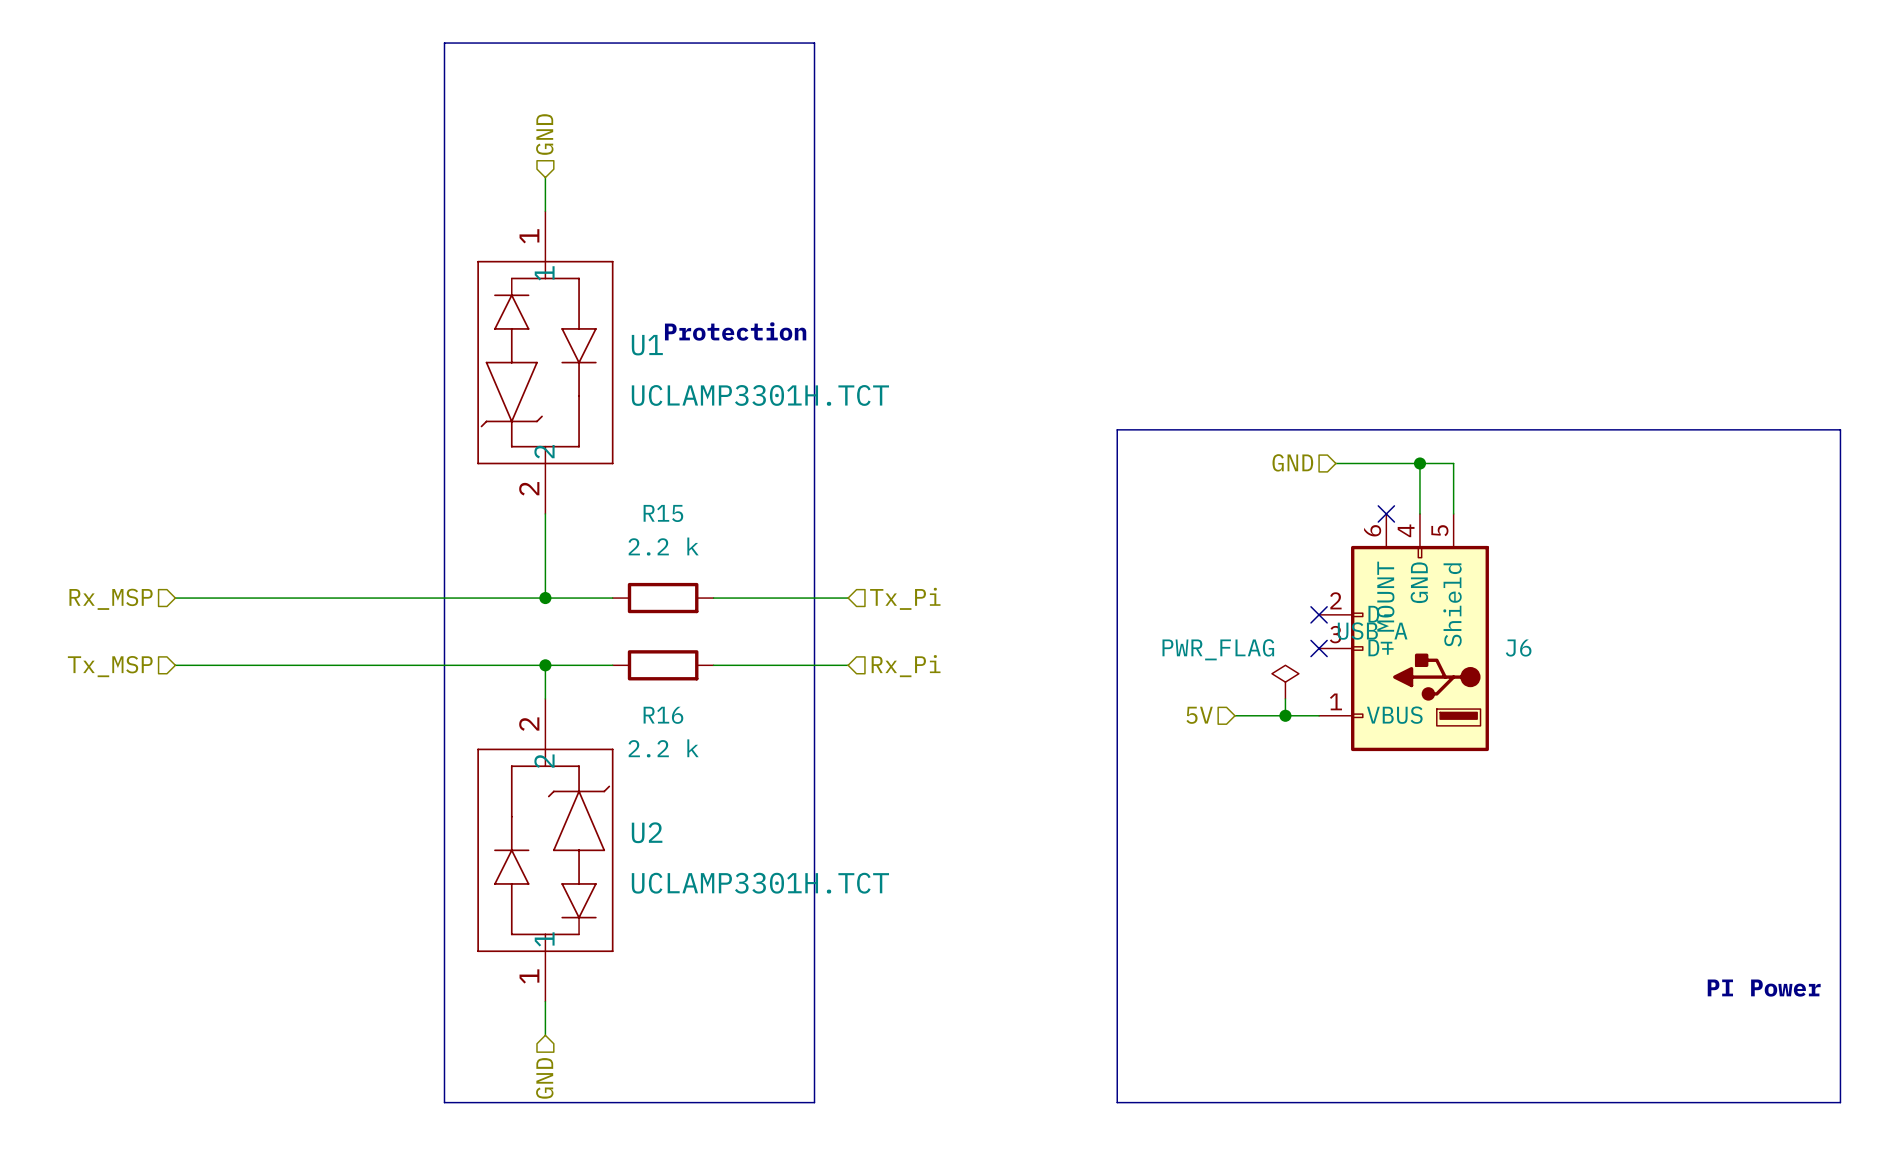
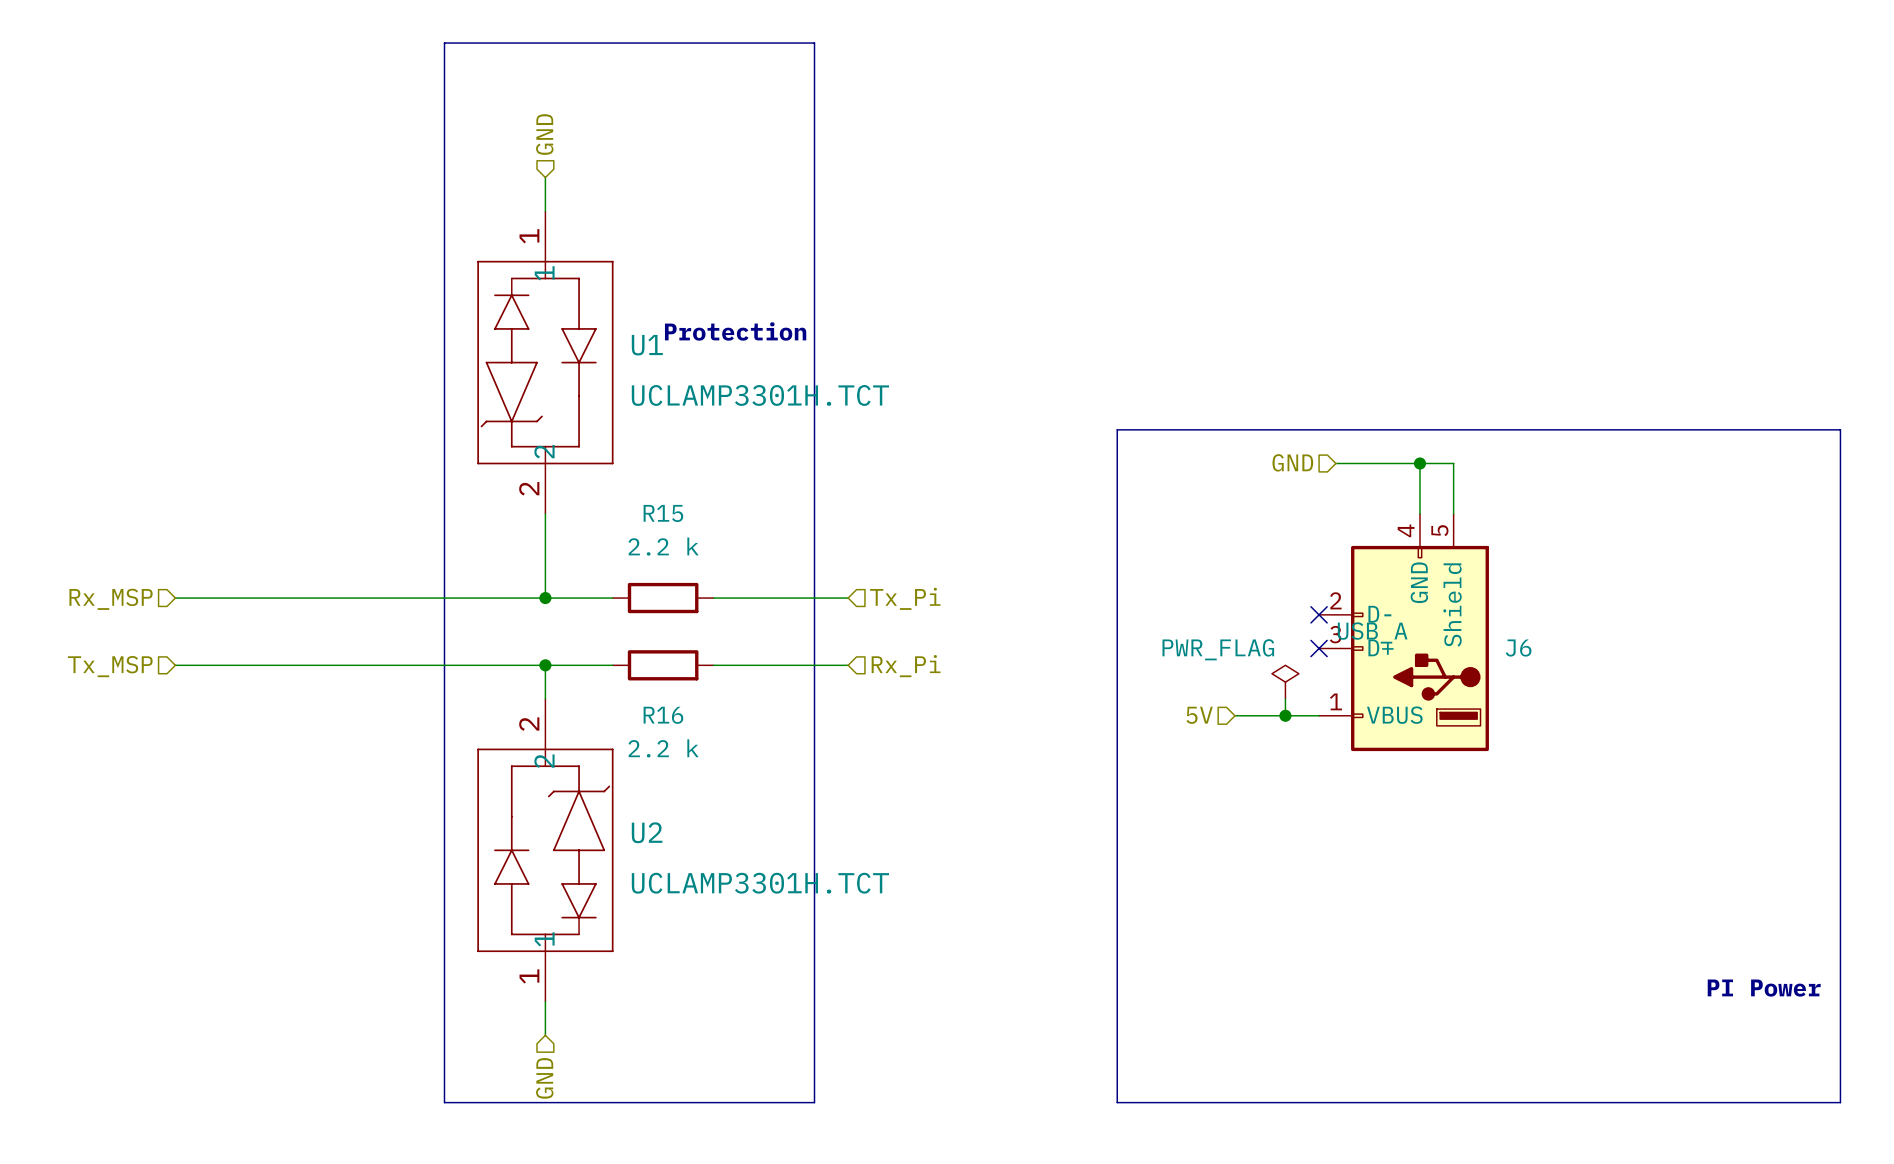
J6 symbol: [1319, 513, 1489, 752] -> [1319, 513, 1489, 752]
no-connect mark: (1386, 513) -> none

